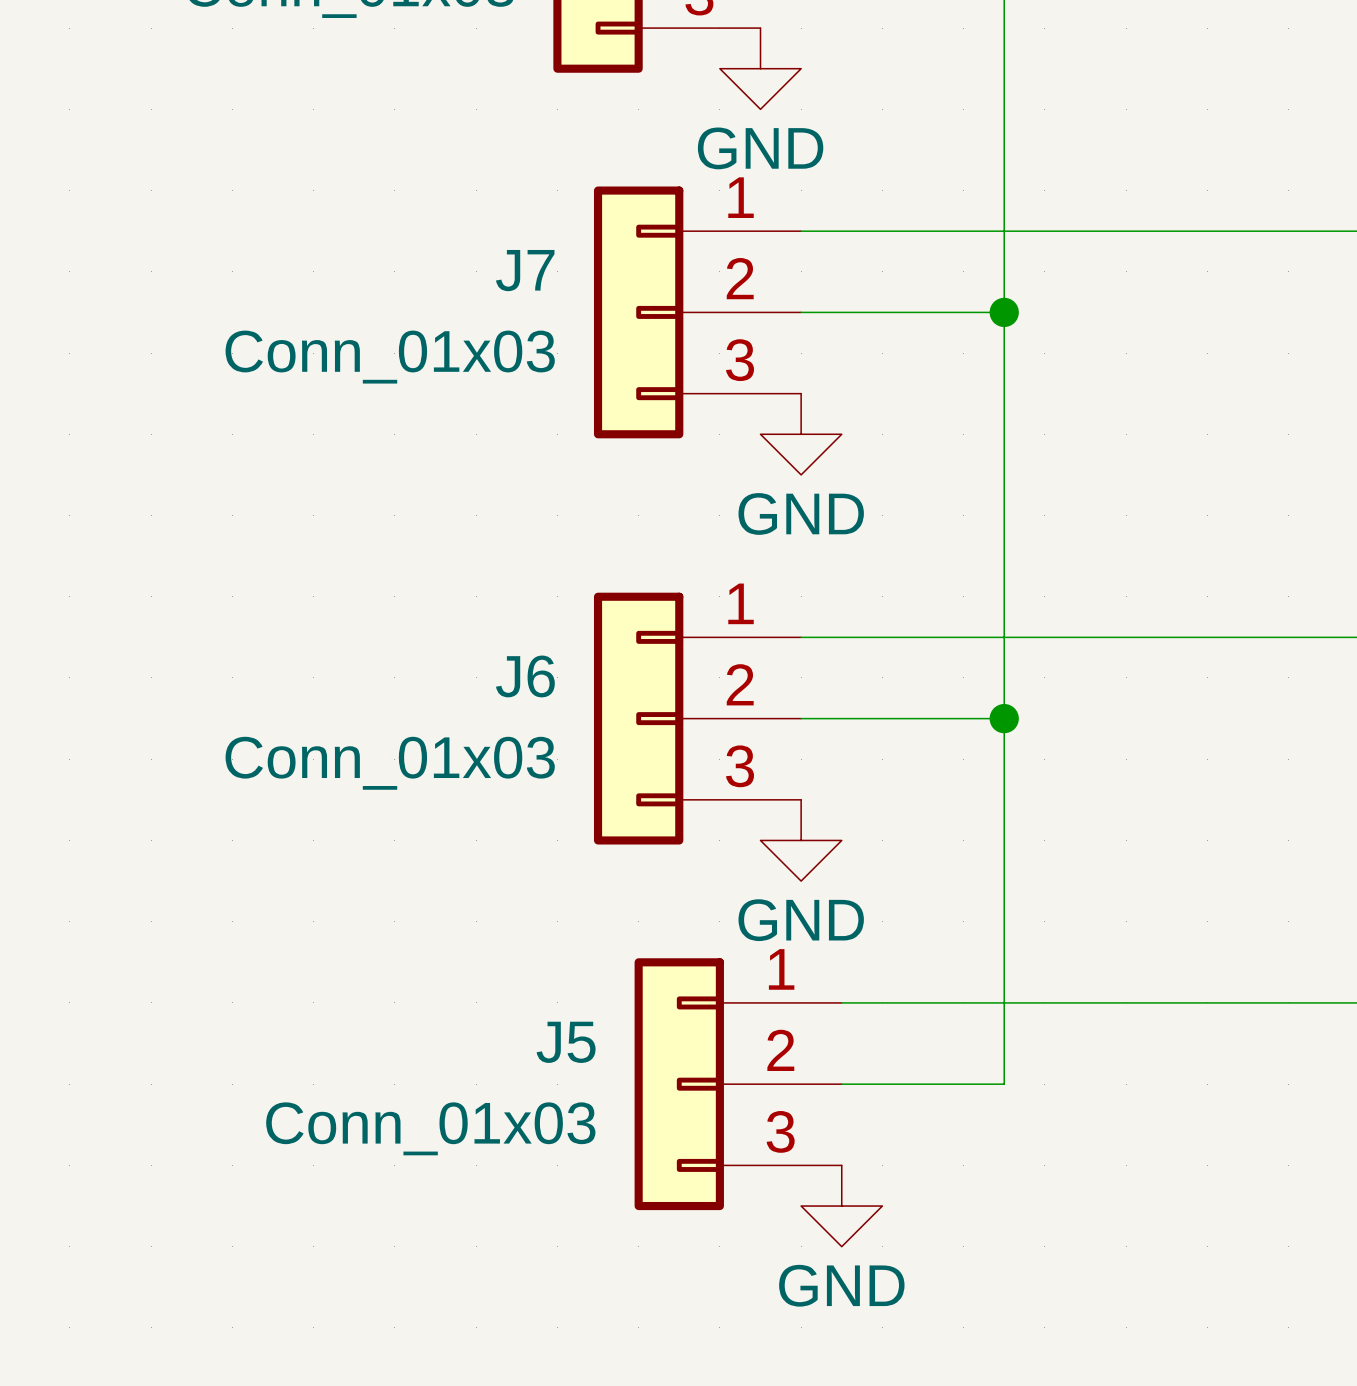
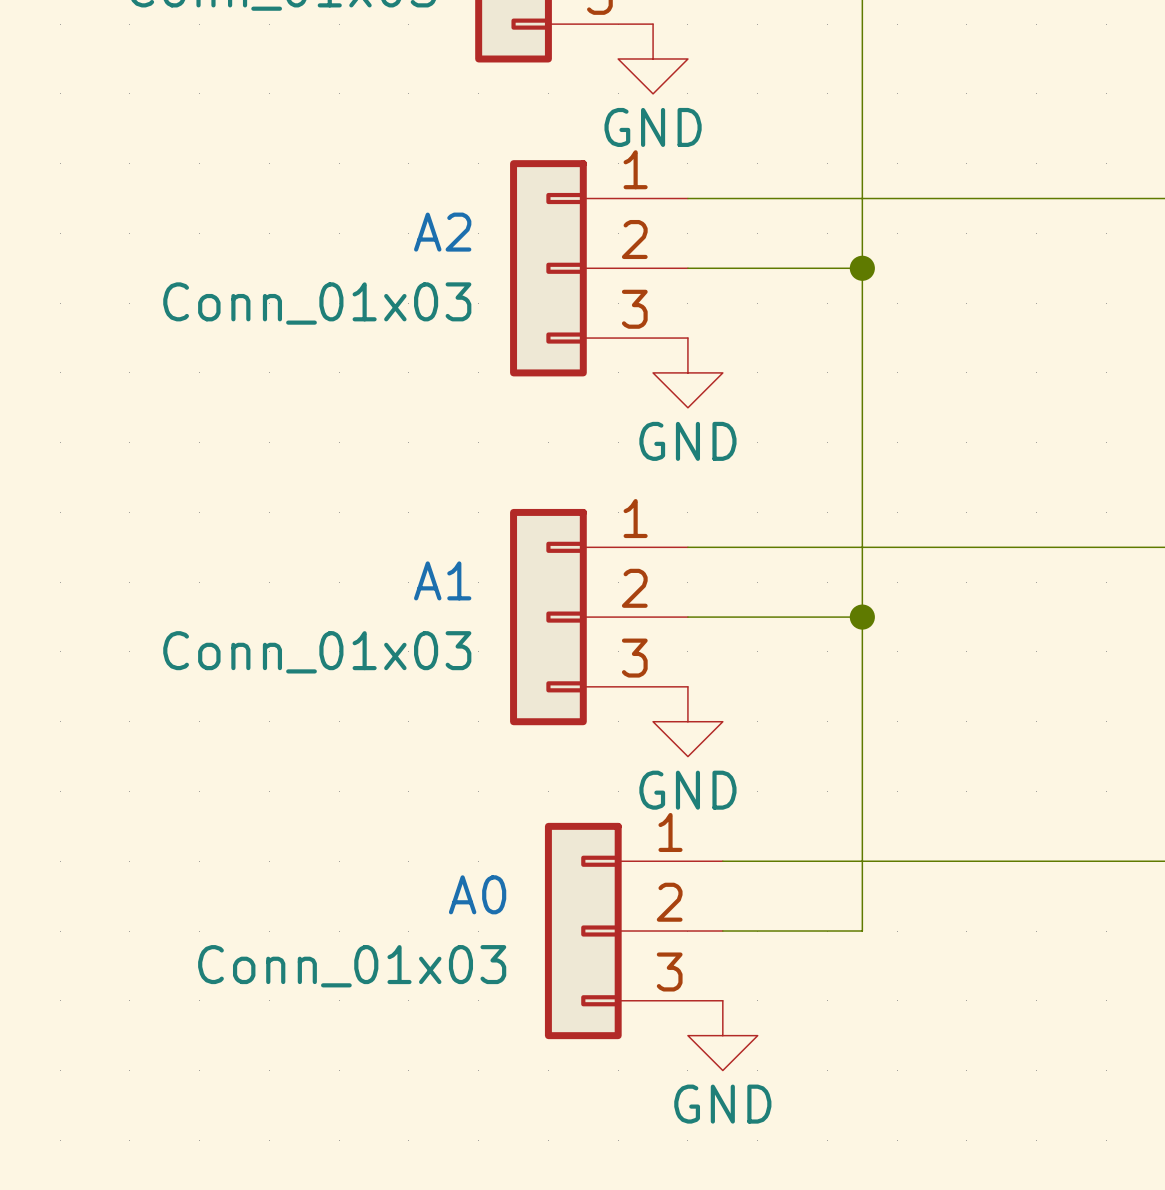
J7 name: J7 (525, 270) -> A2 (442, 232)
J6 name: J6 (525, 676) -> A1 (442, 580)
J5 name: J5 (566, 1042) -> A0 (477, 894)

